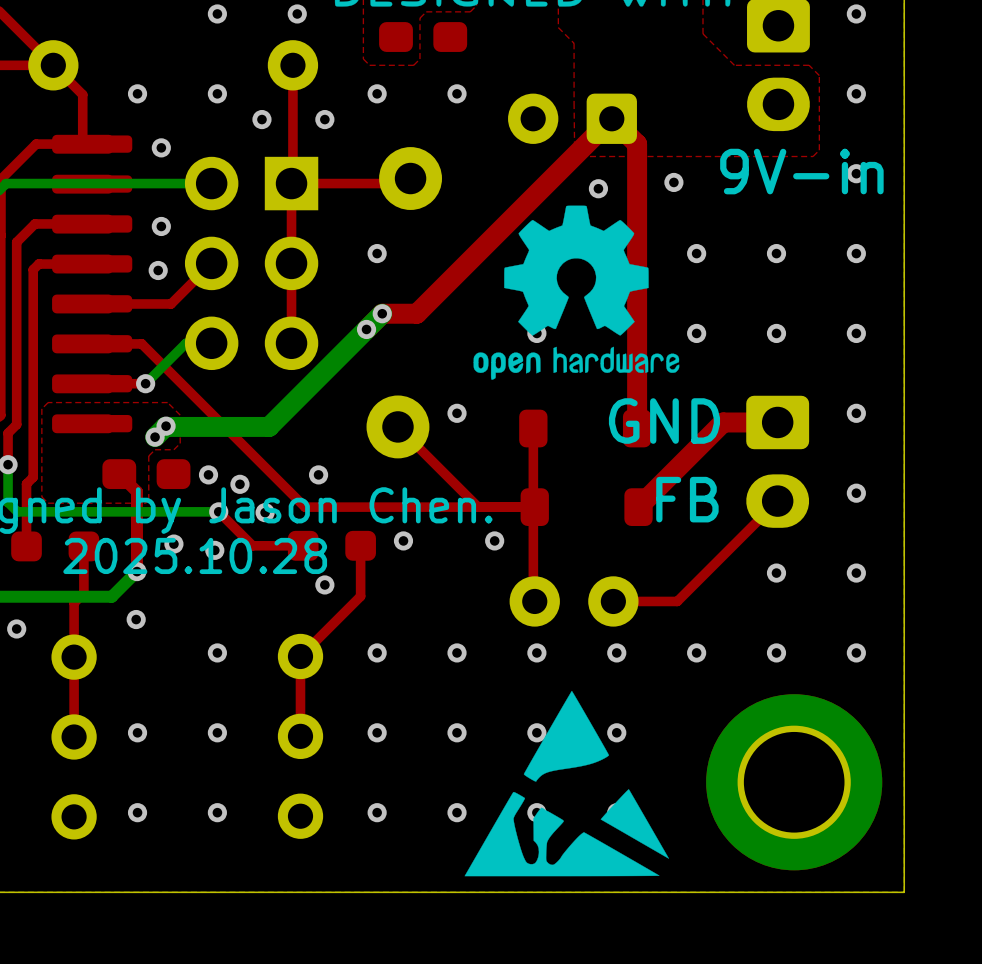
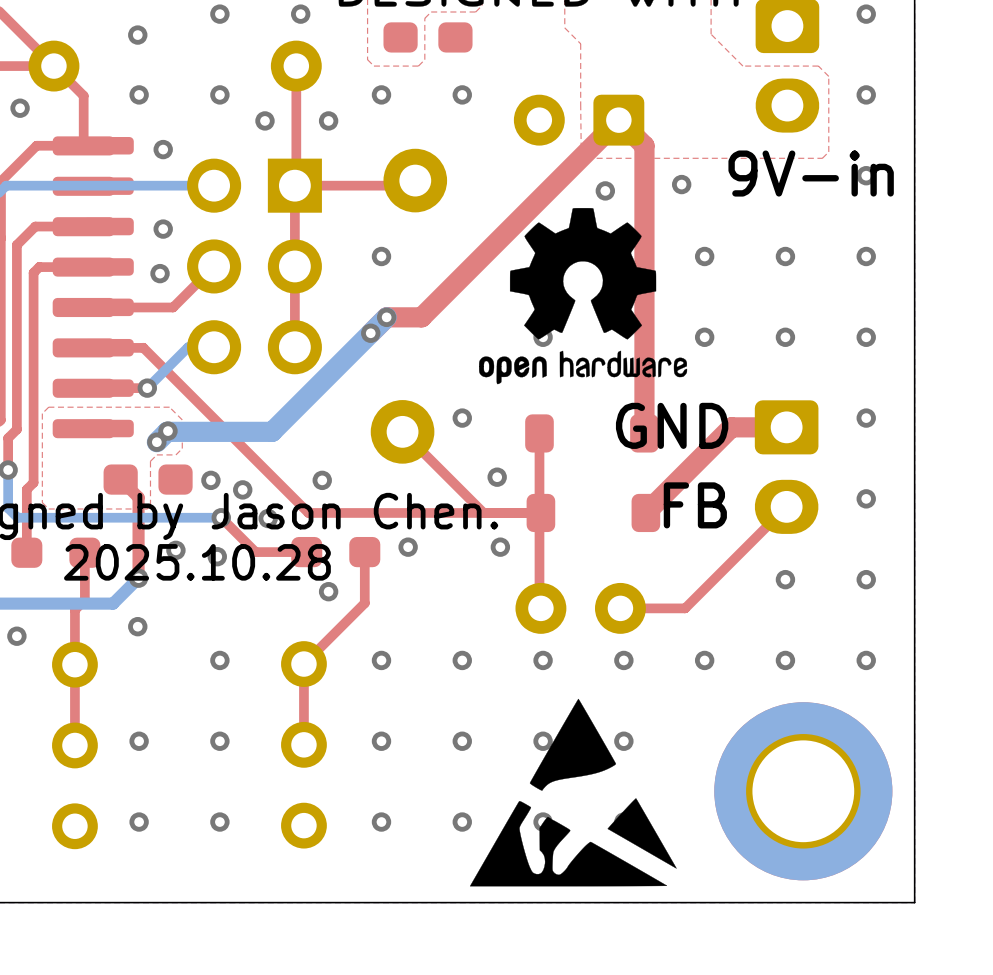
via: none -> (137, 35)
via: none -> (20, 108)
via: none -> (497, 477)

